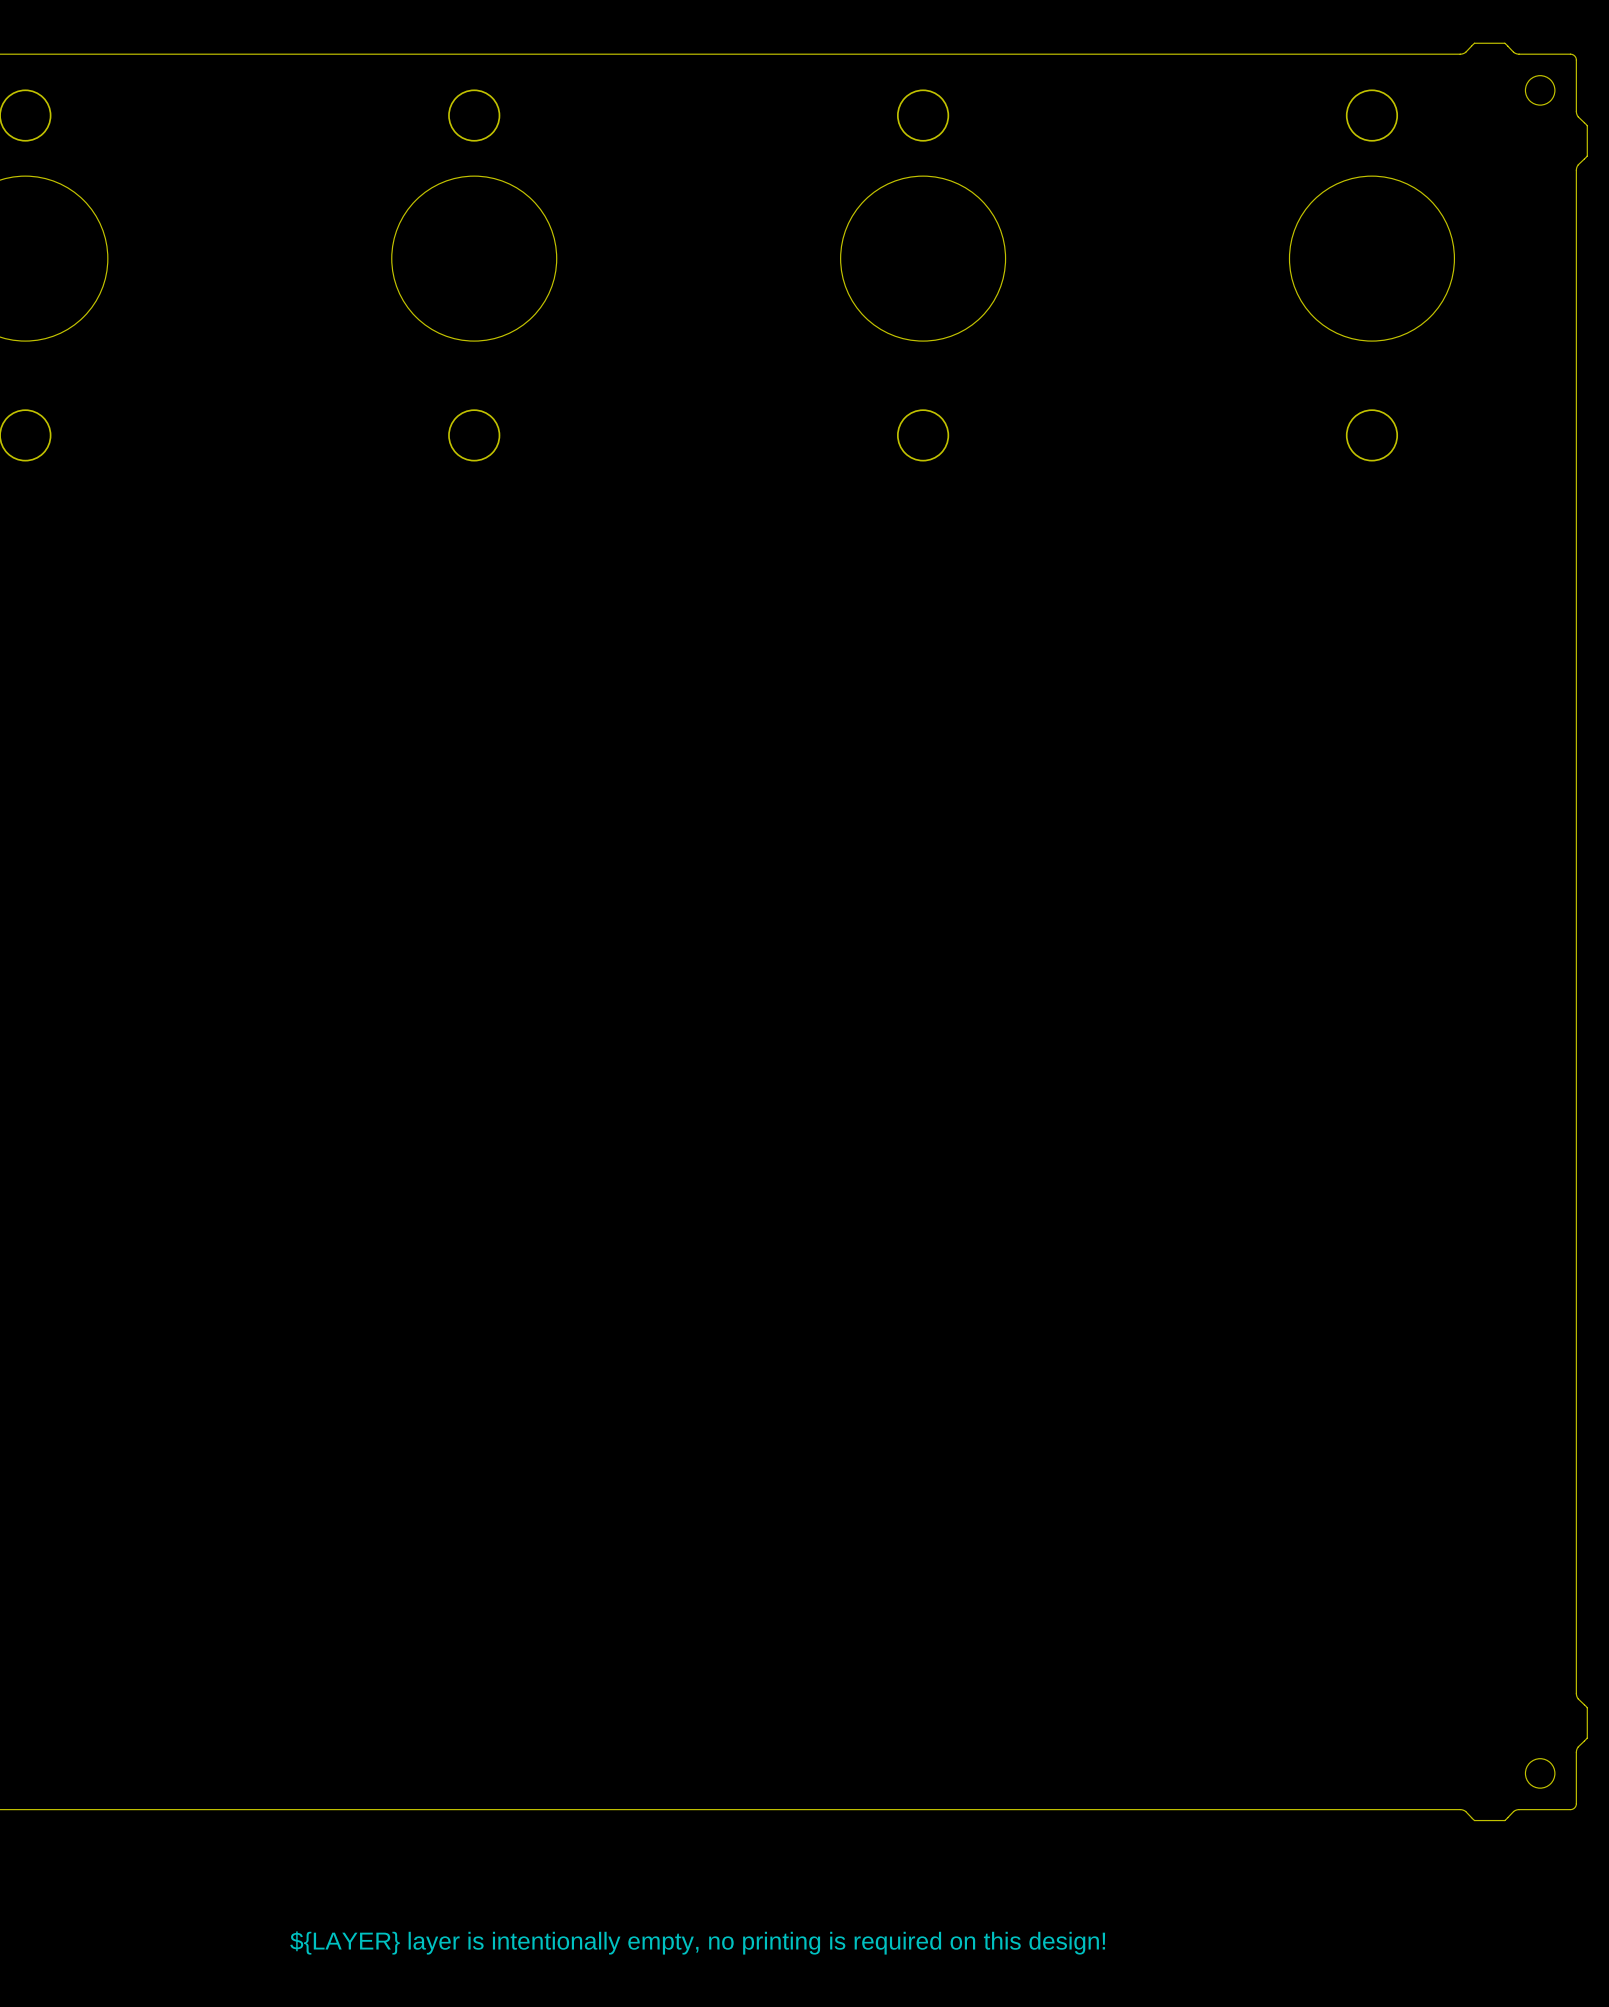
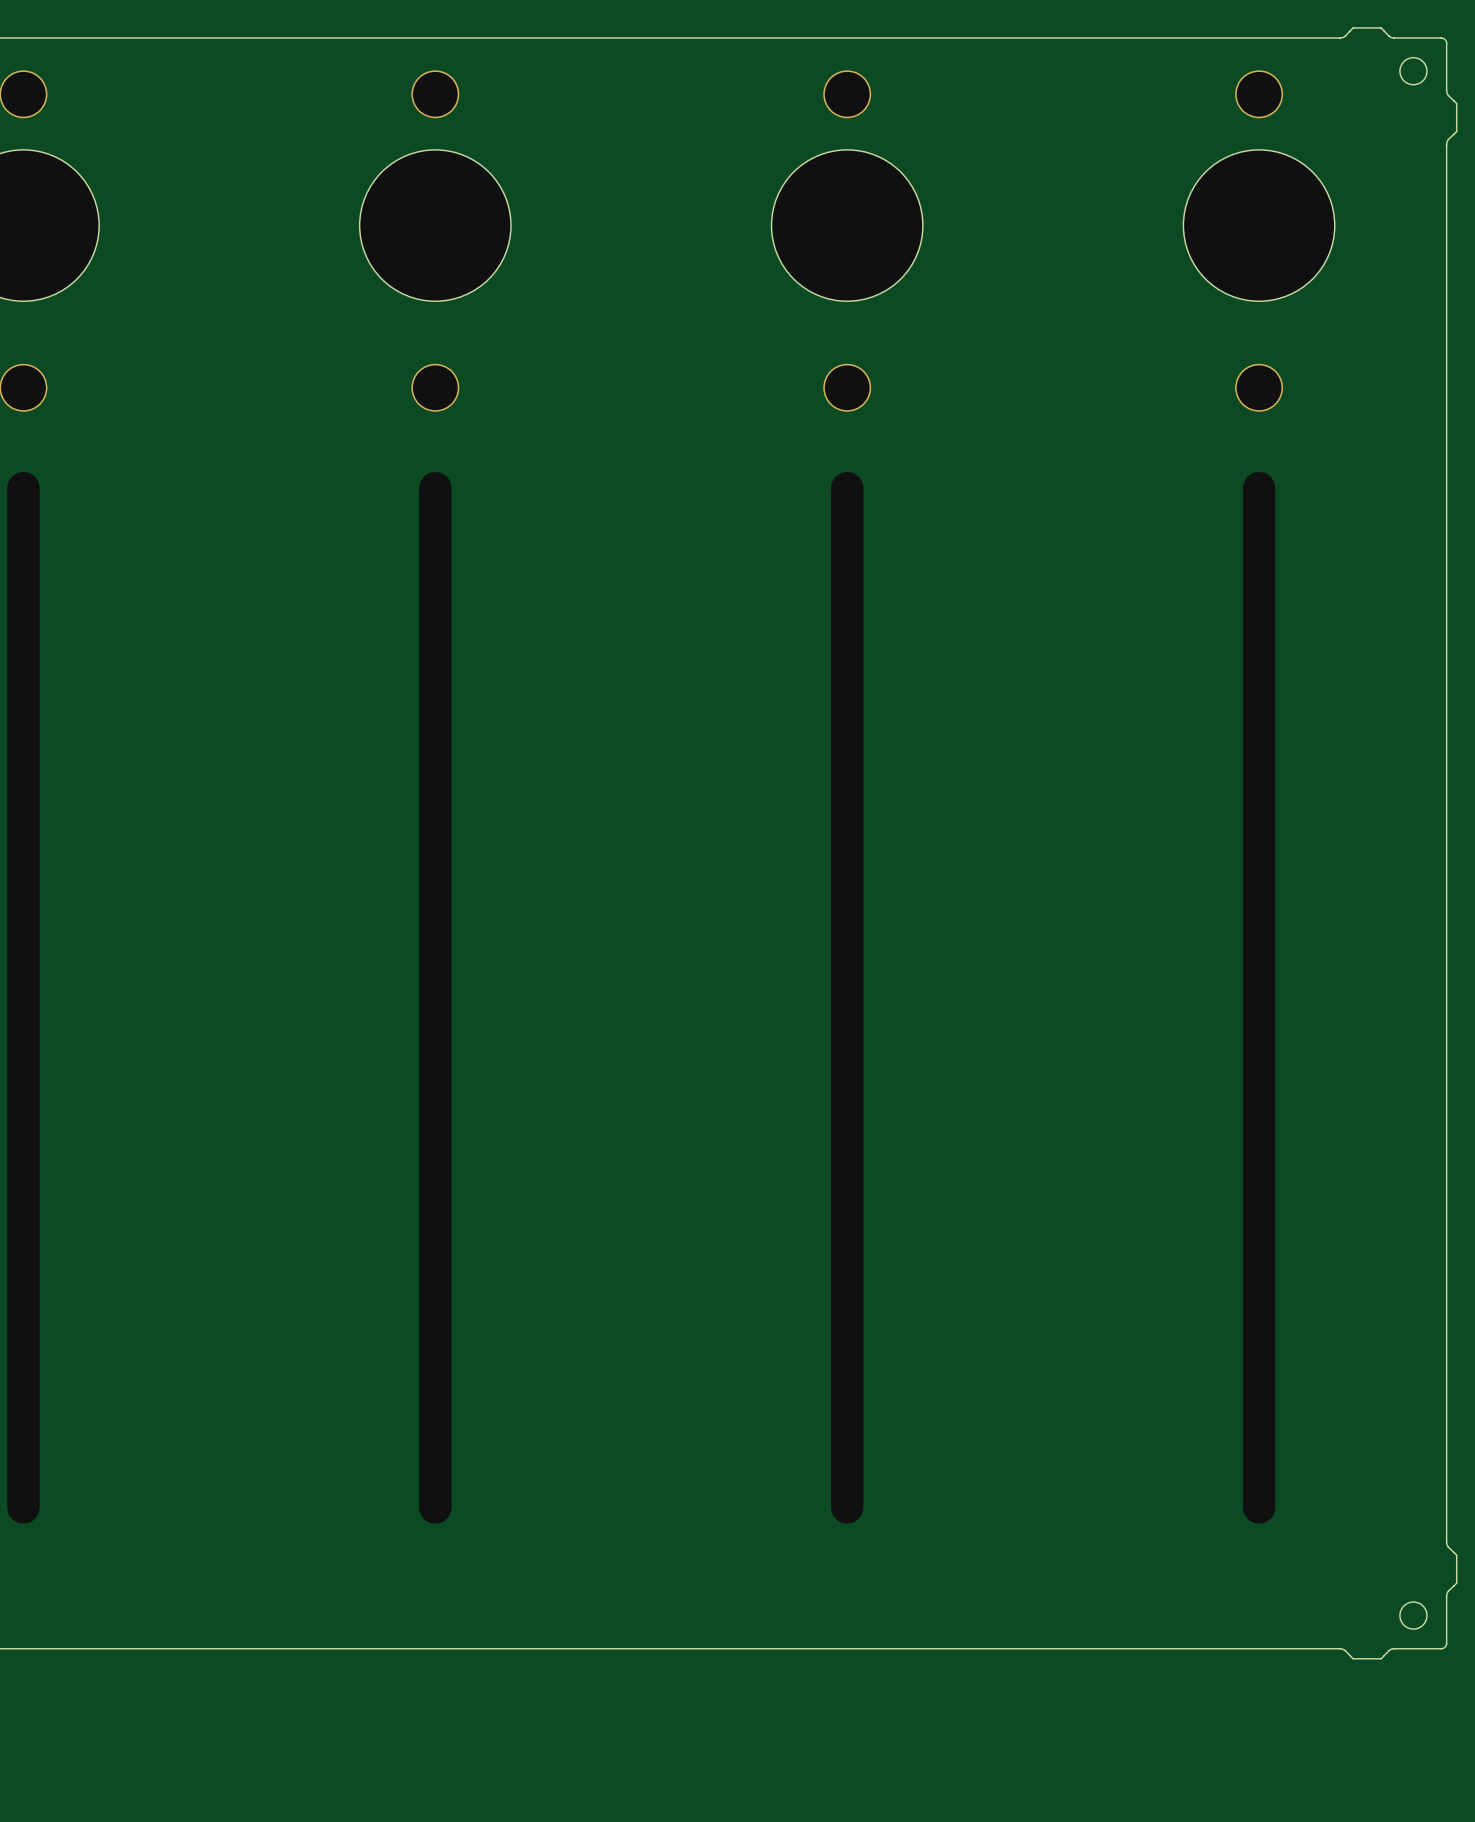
text: ${LAYER} layer is intentionally empty, no printing is required on this design! (697, 1942) -> none

